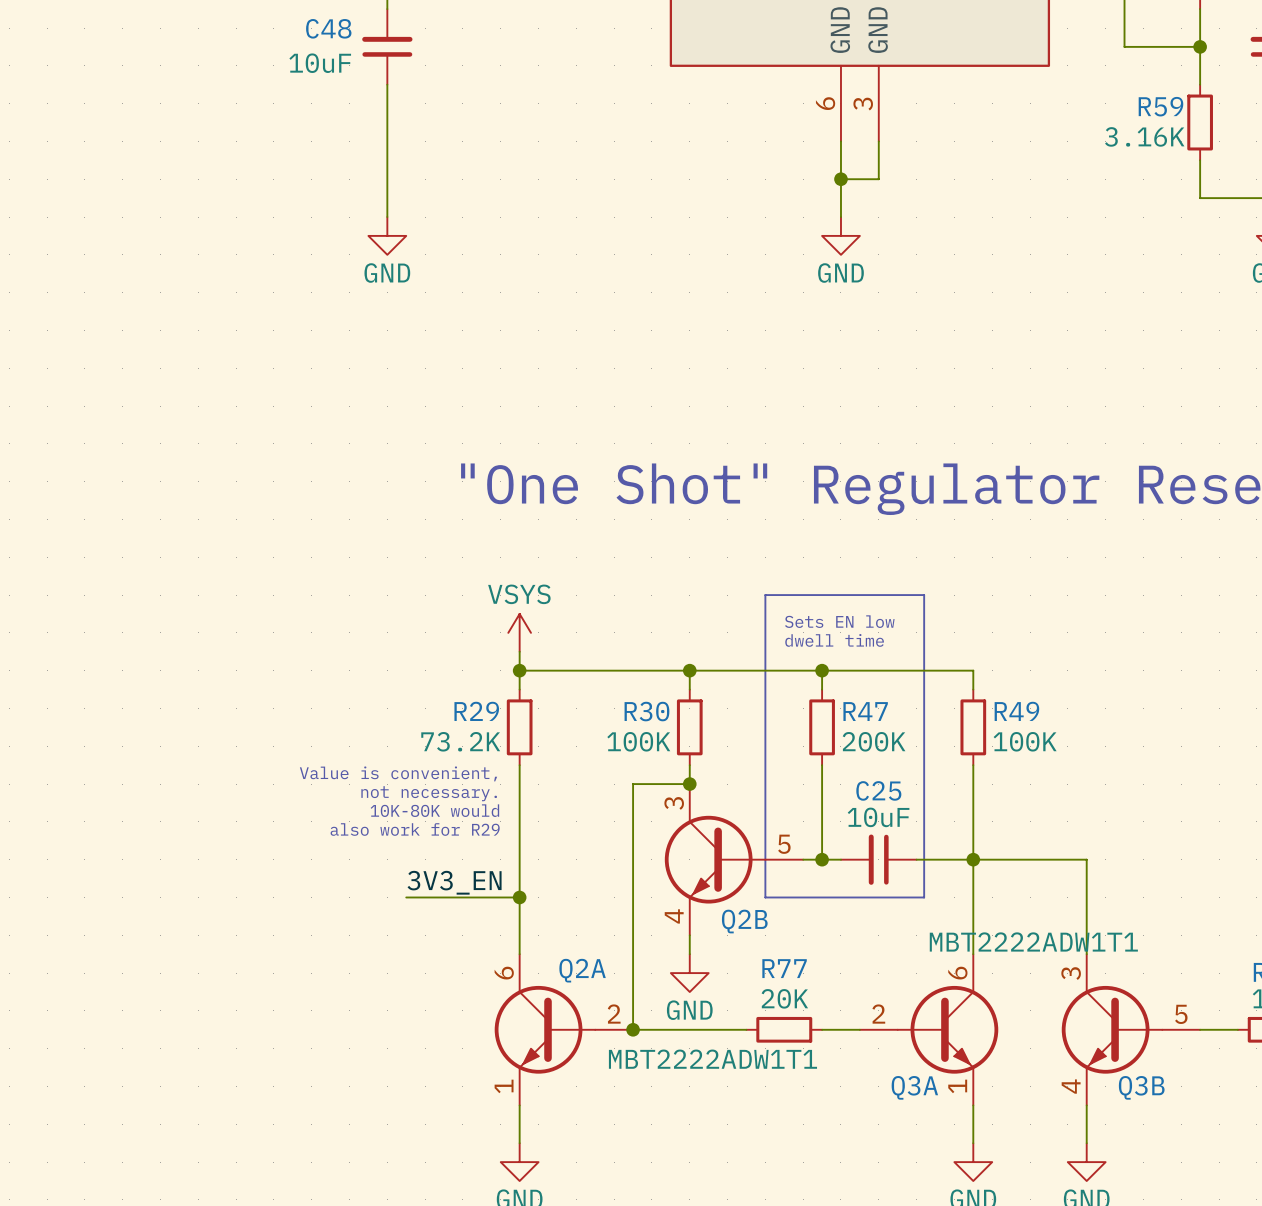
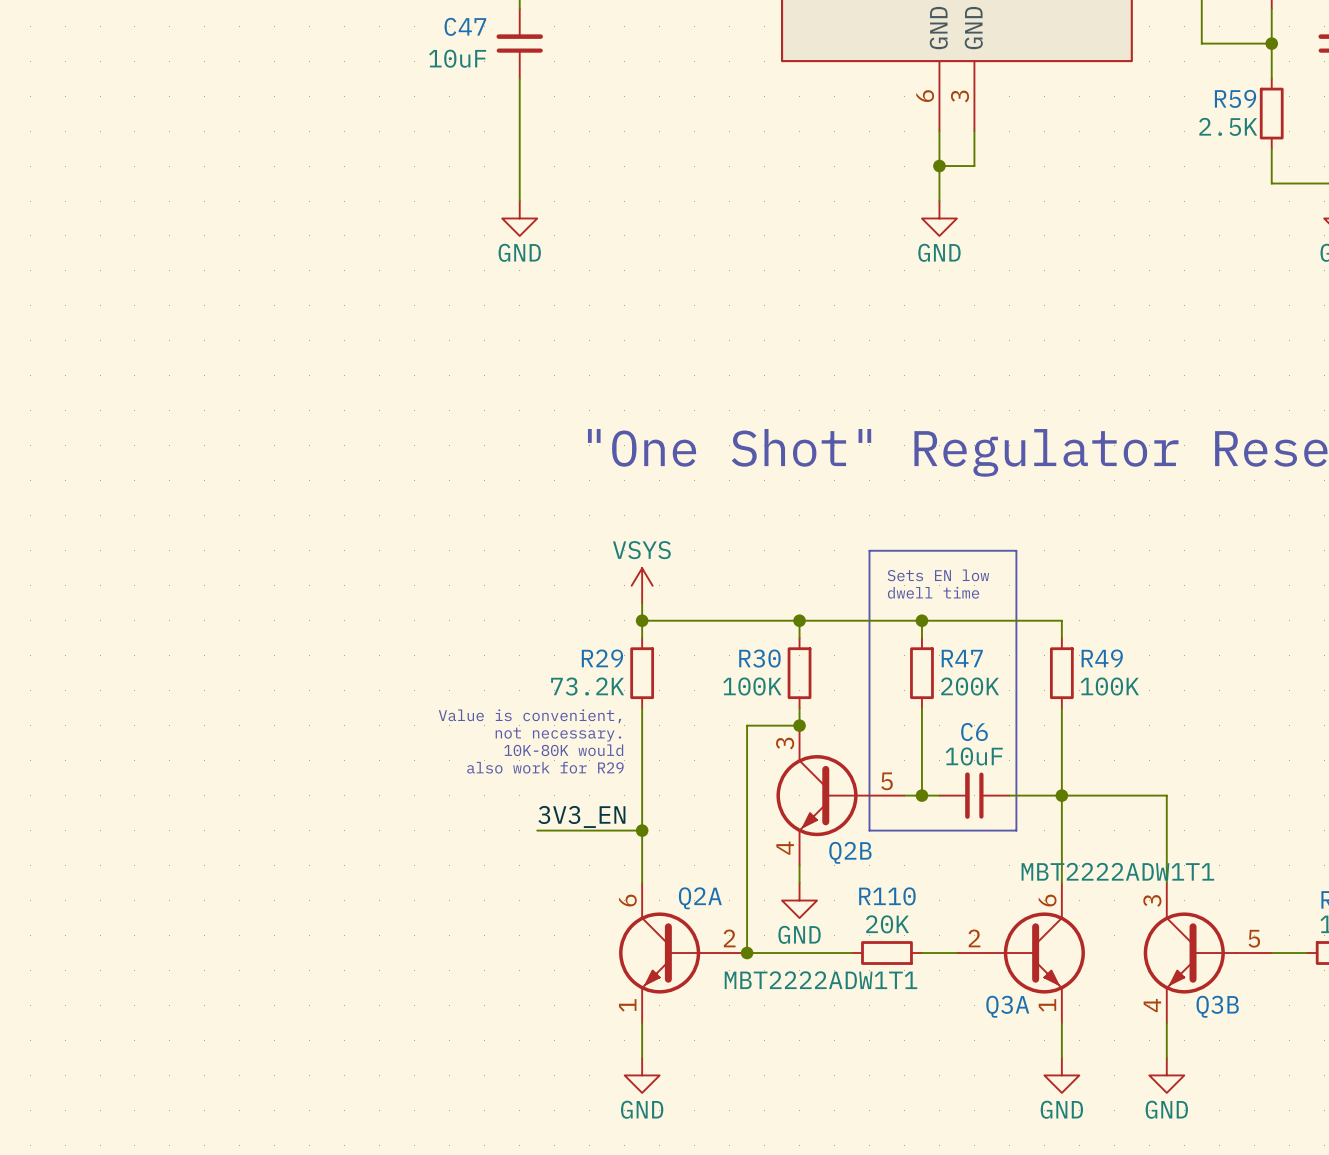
C48 name: C48 (328, 28) -> C47 (465, 26)
R59 value: 3.16K (1144, 136) -> 2.5K (1228, 126)
C25 name: C25 (878, 790) -> C6 (974, 732)
R77 name: R77 (784, 968) -> R110 (887, 896)

